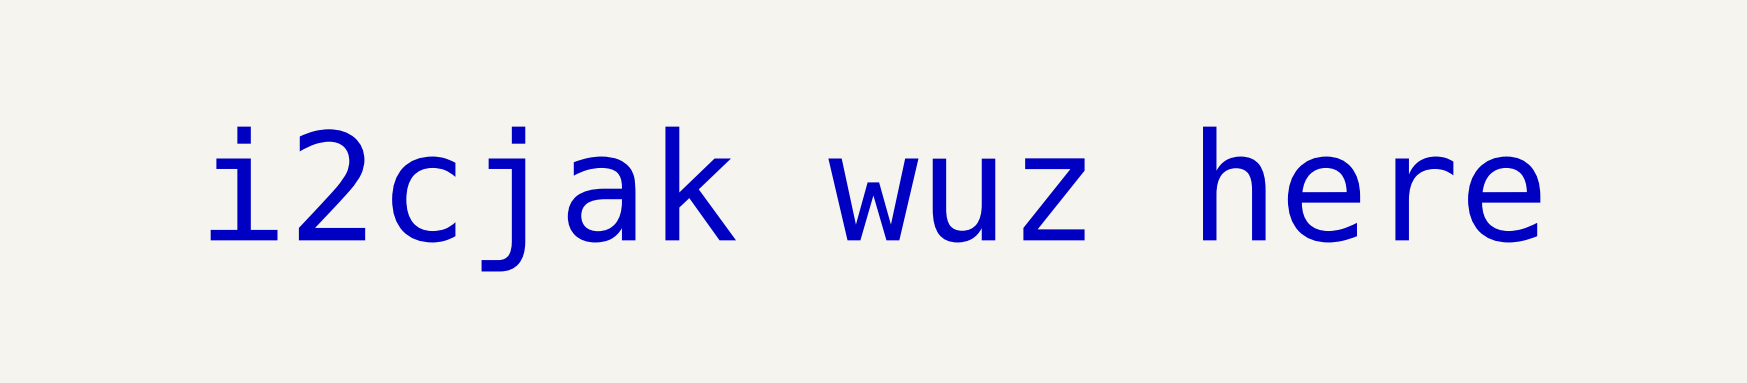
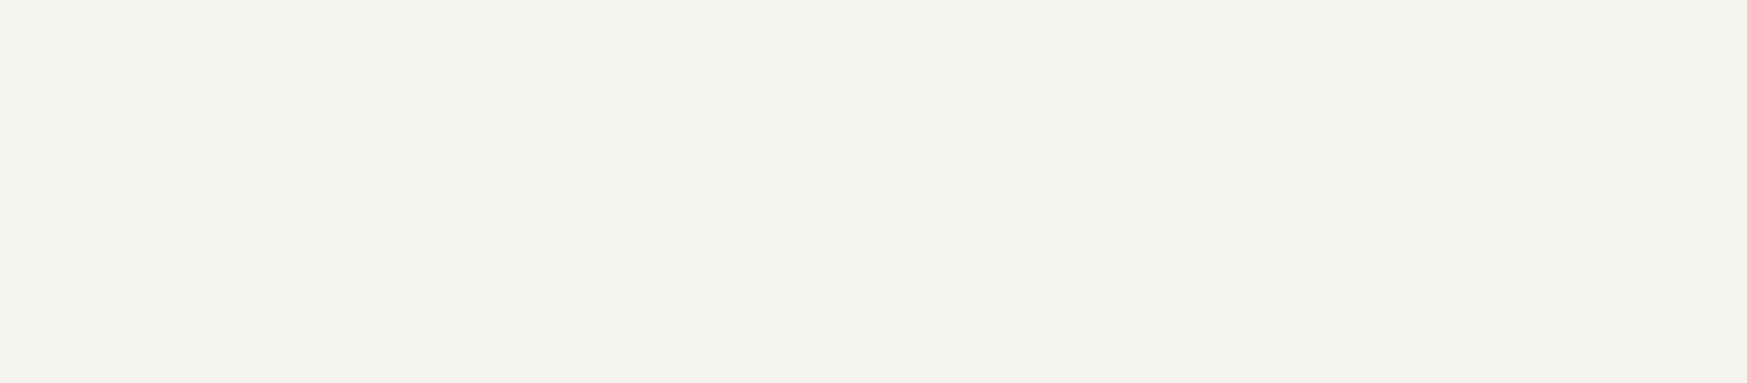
text: i2cjak wuz here (875, 199) -> none

